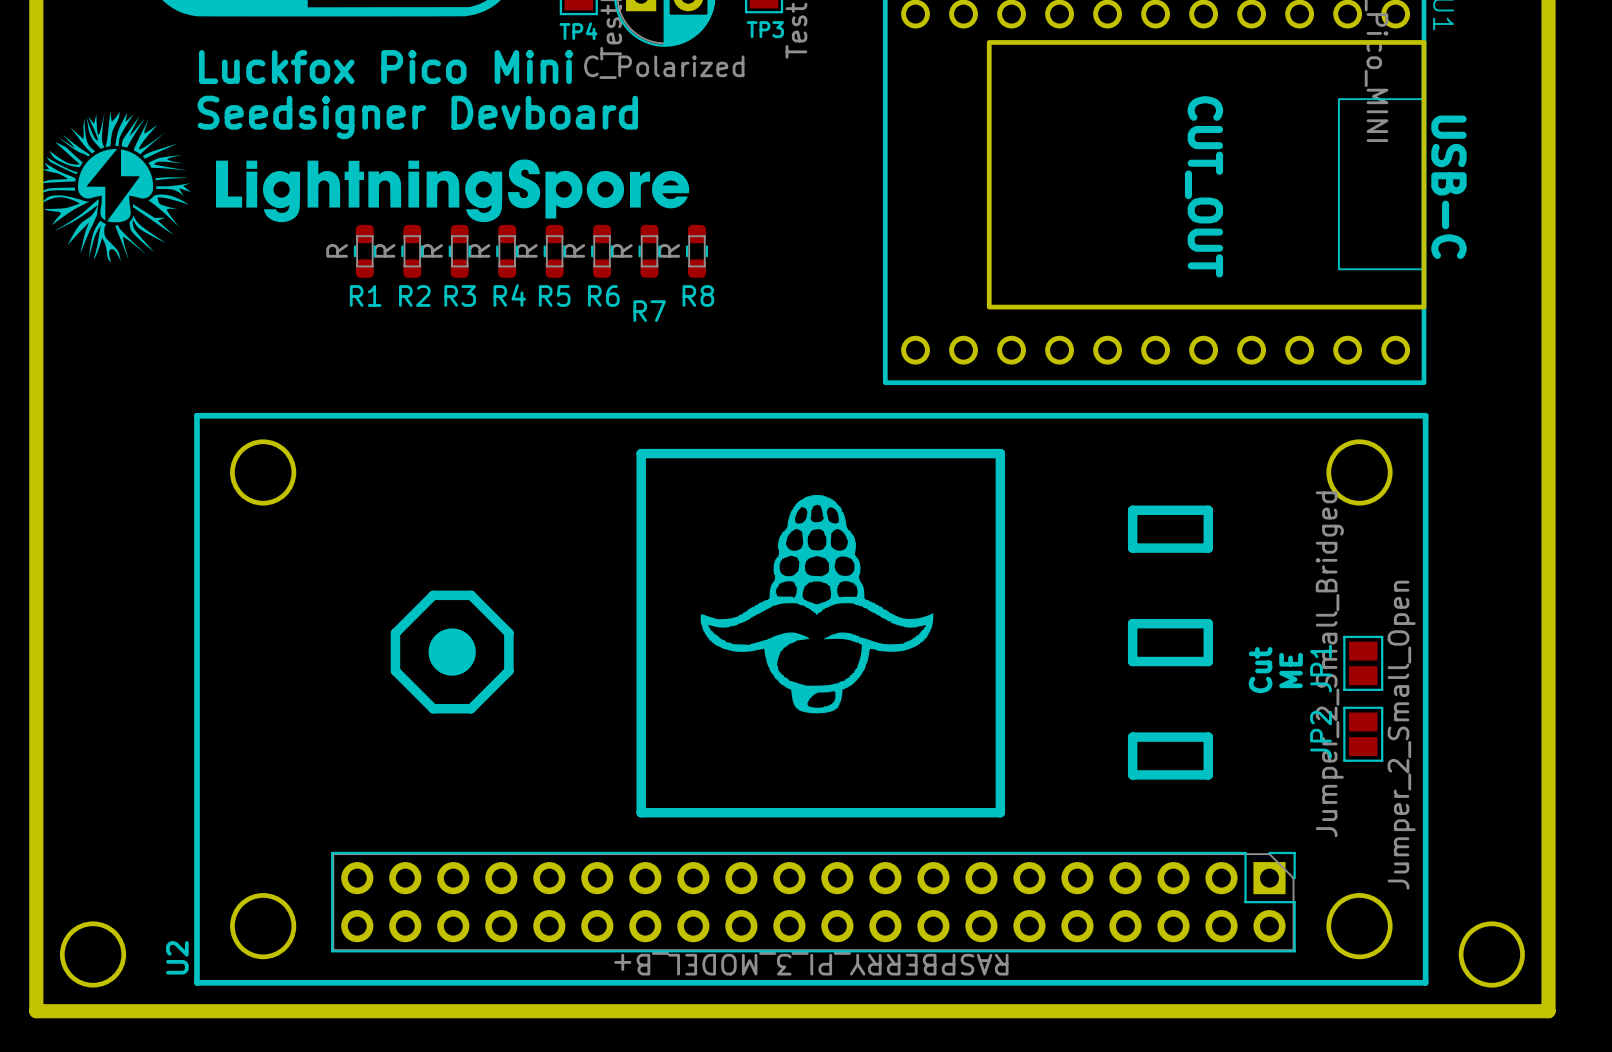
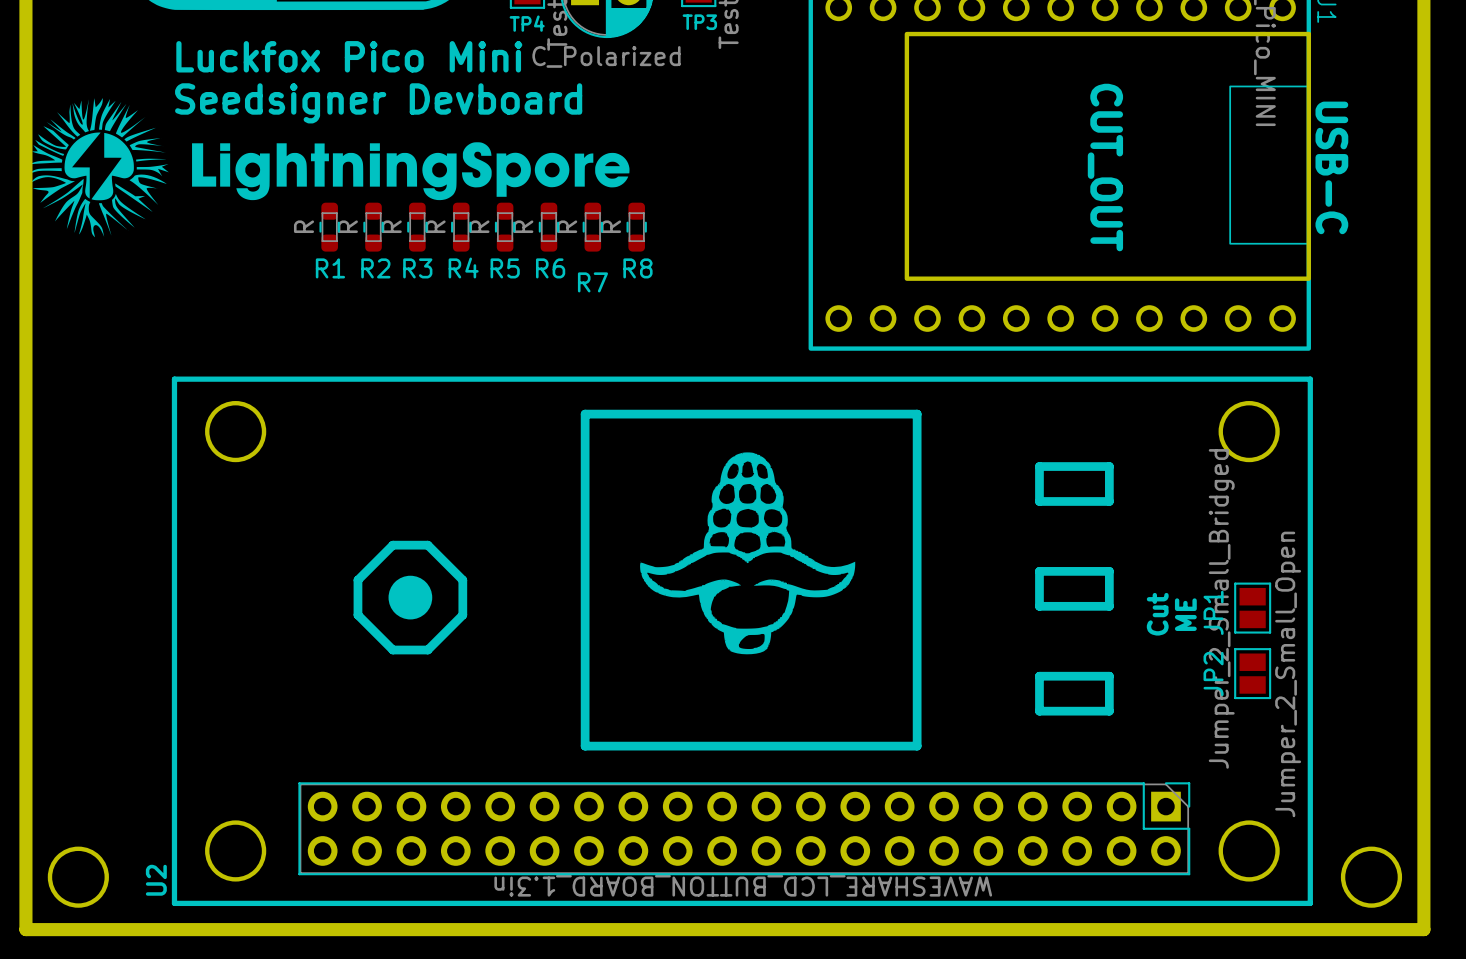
U2 value: RASPBERRY_PI_3_MODEL_B+ (811, 963) -> WAVESHARE_LCD_BUTTON_BOARD_1.3in (743, 885)

